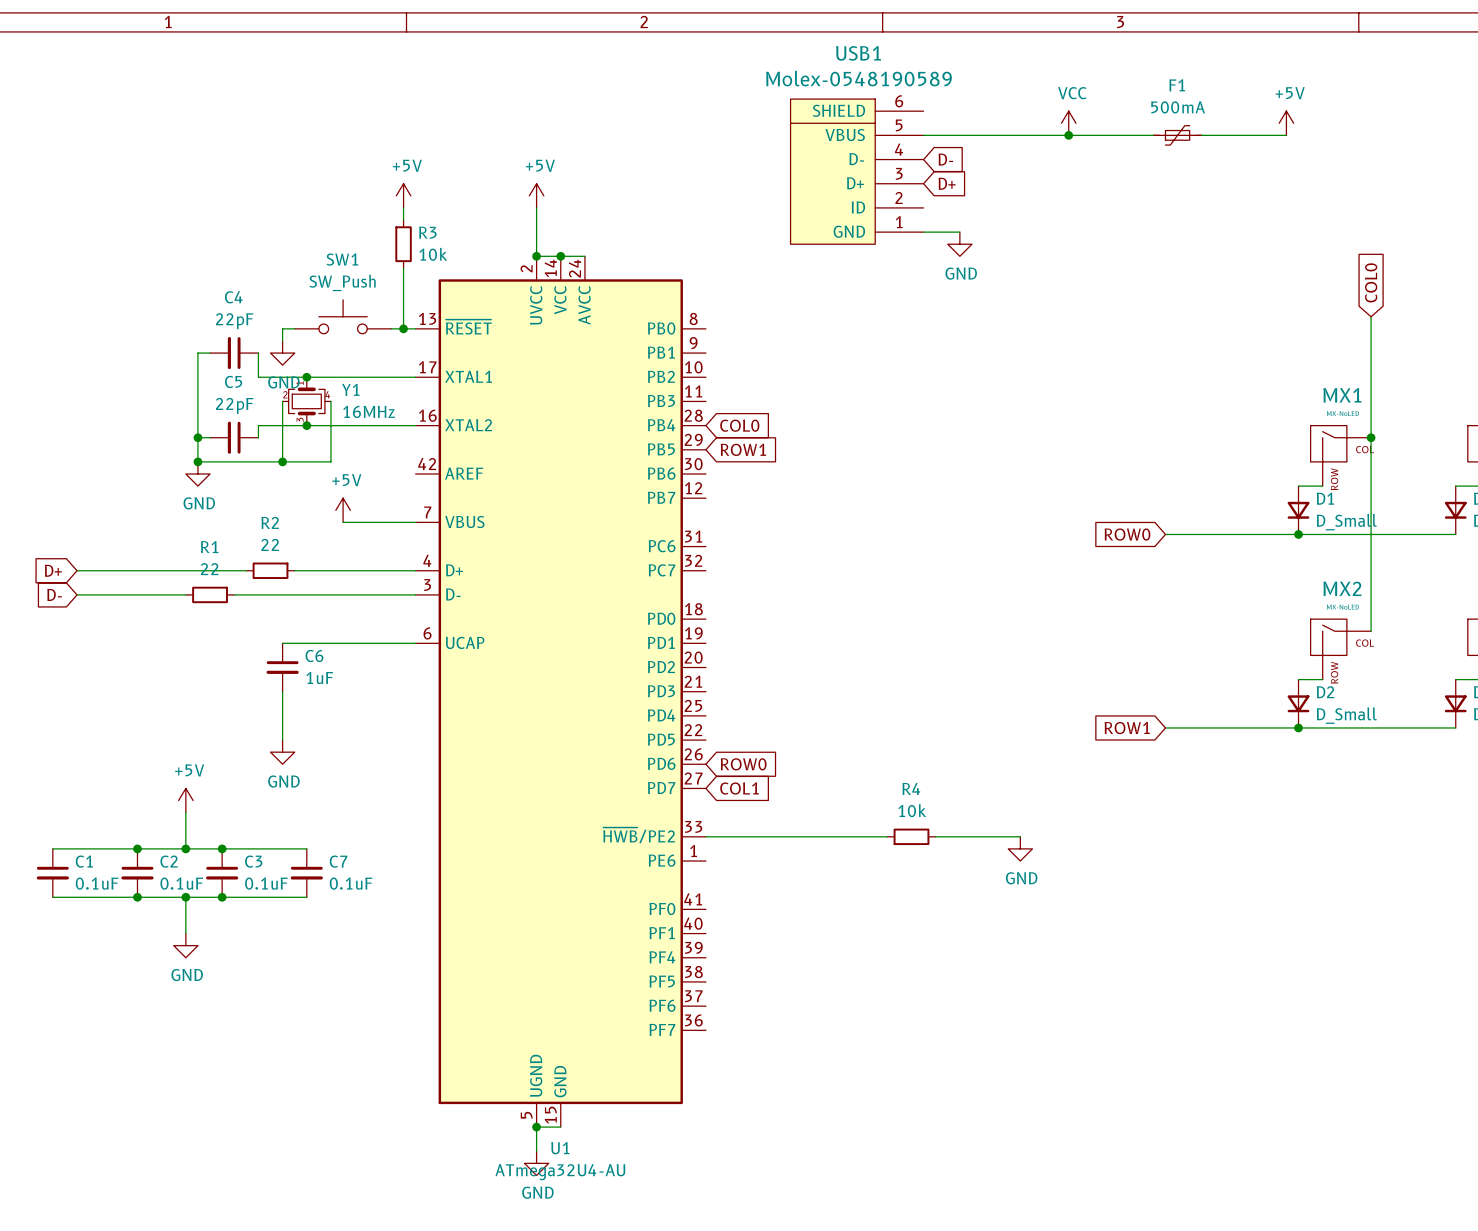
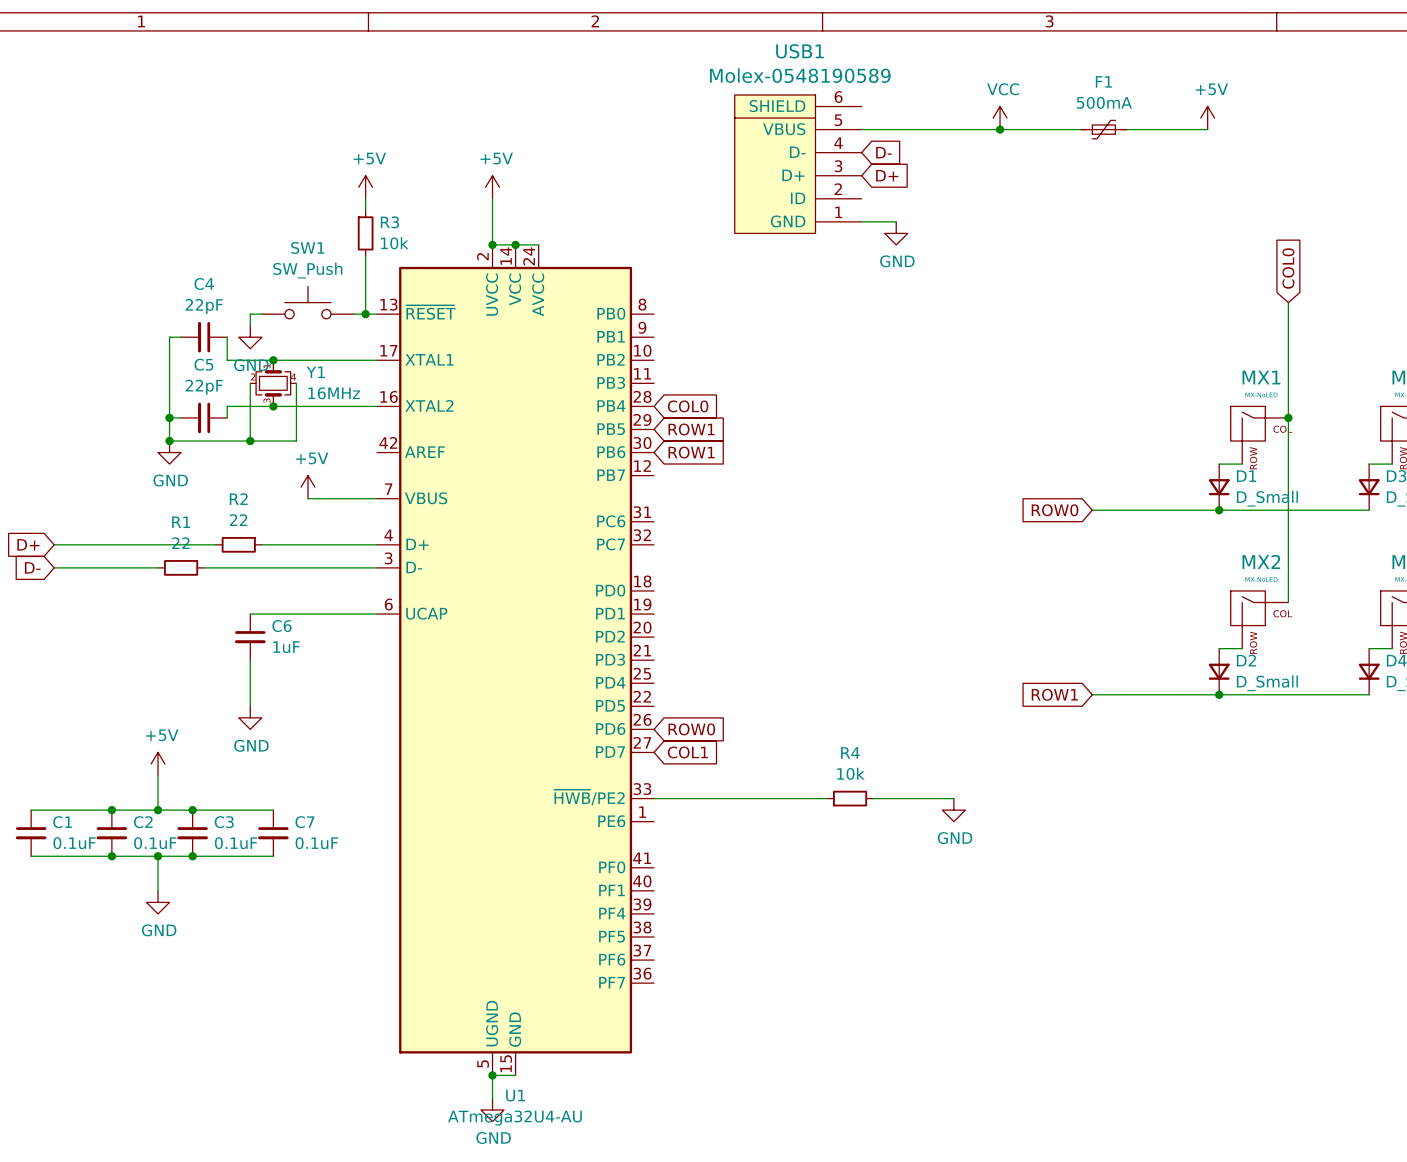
global label: none -> ROW1 (691, 452)

